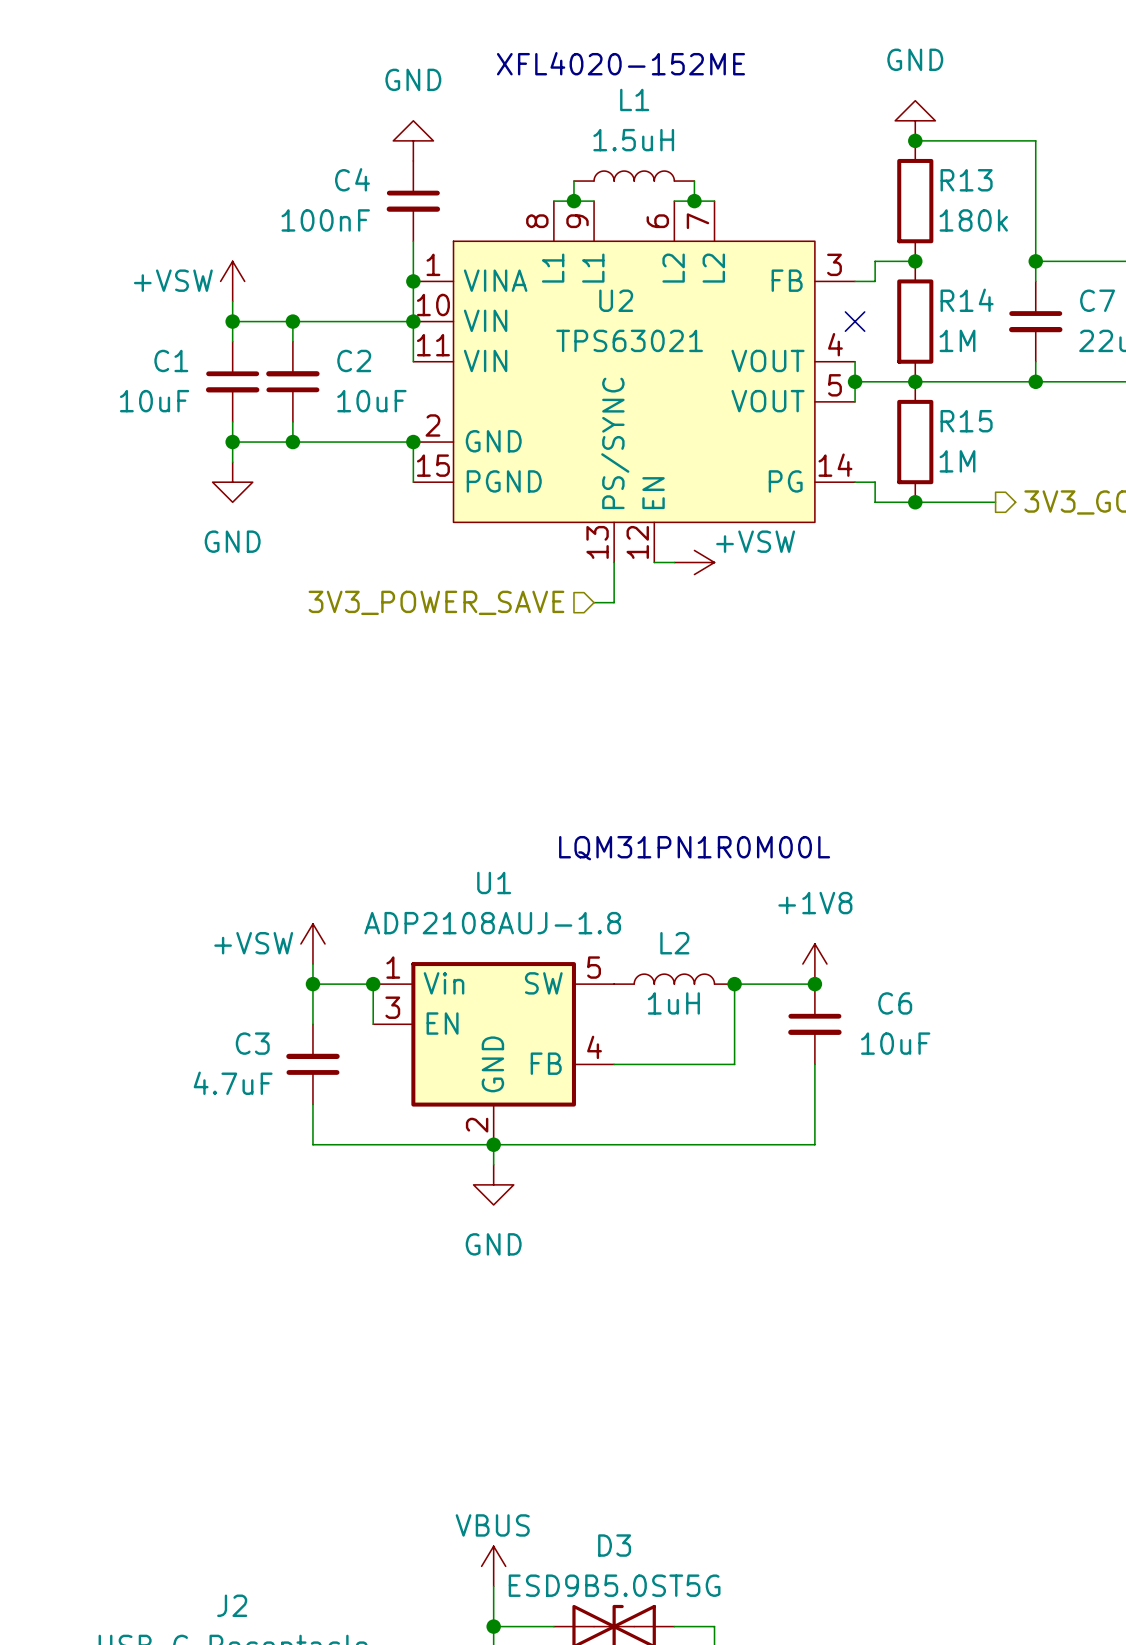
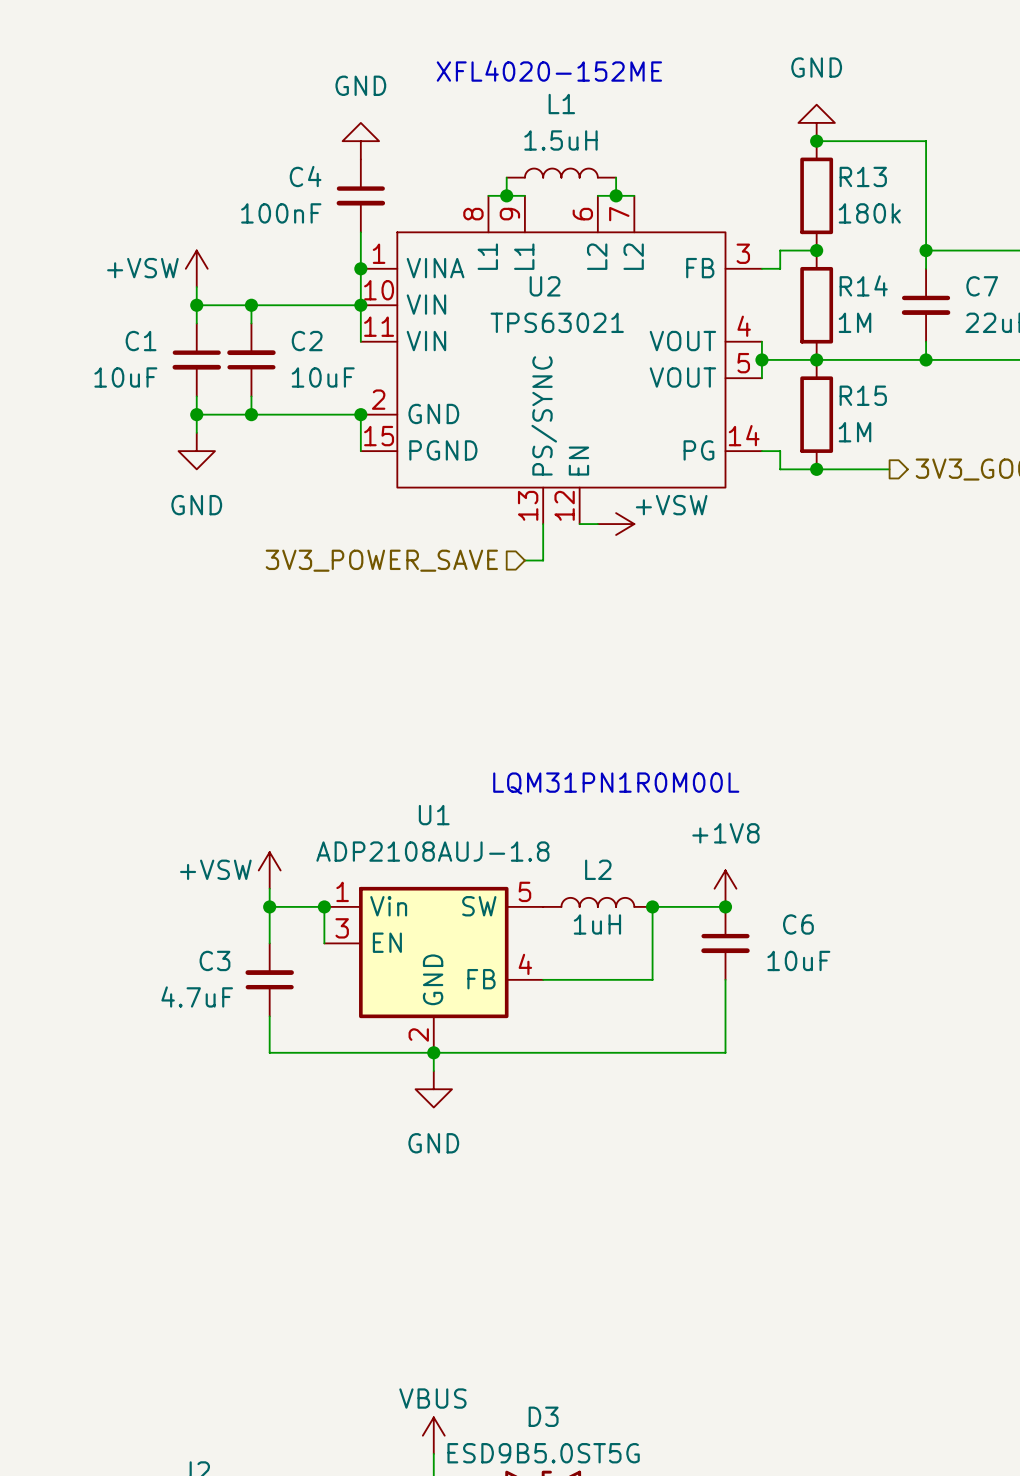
U2 symbol: [413, 201, 856, 563] -> [360, 195, 762, 525]
no-connect mark: (855, 321) -> none

